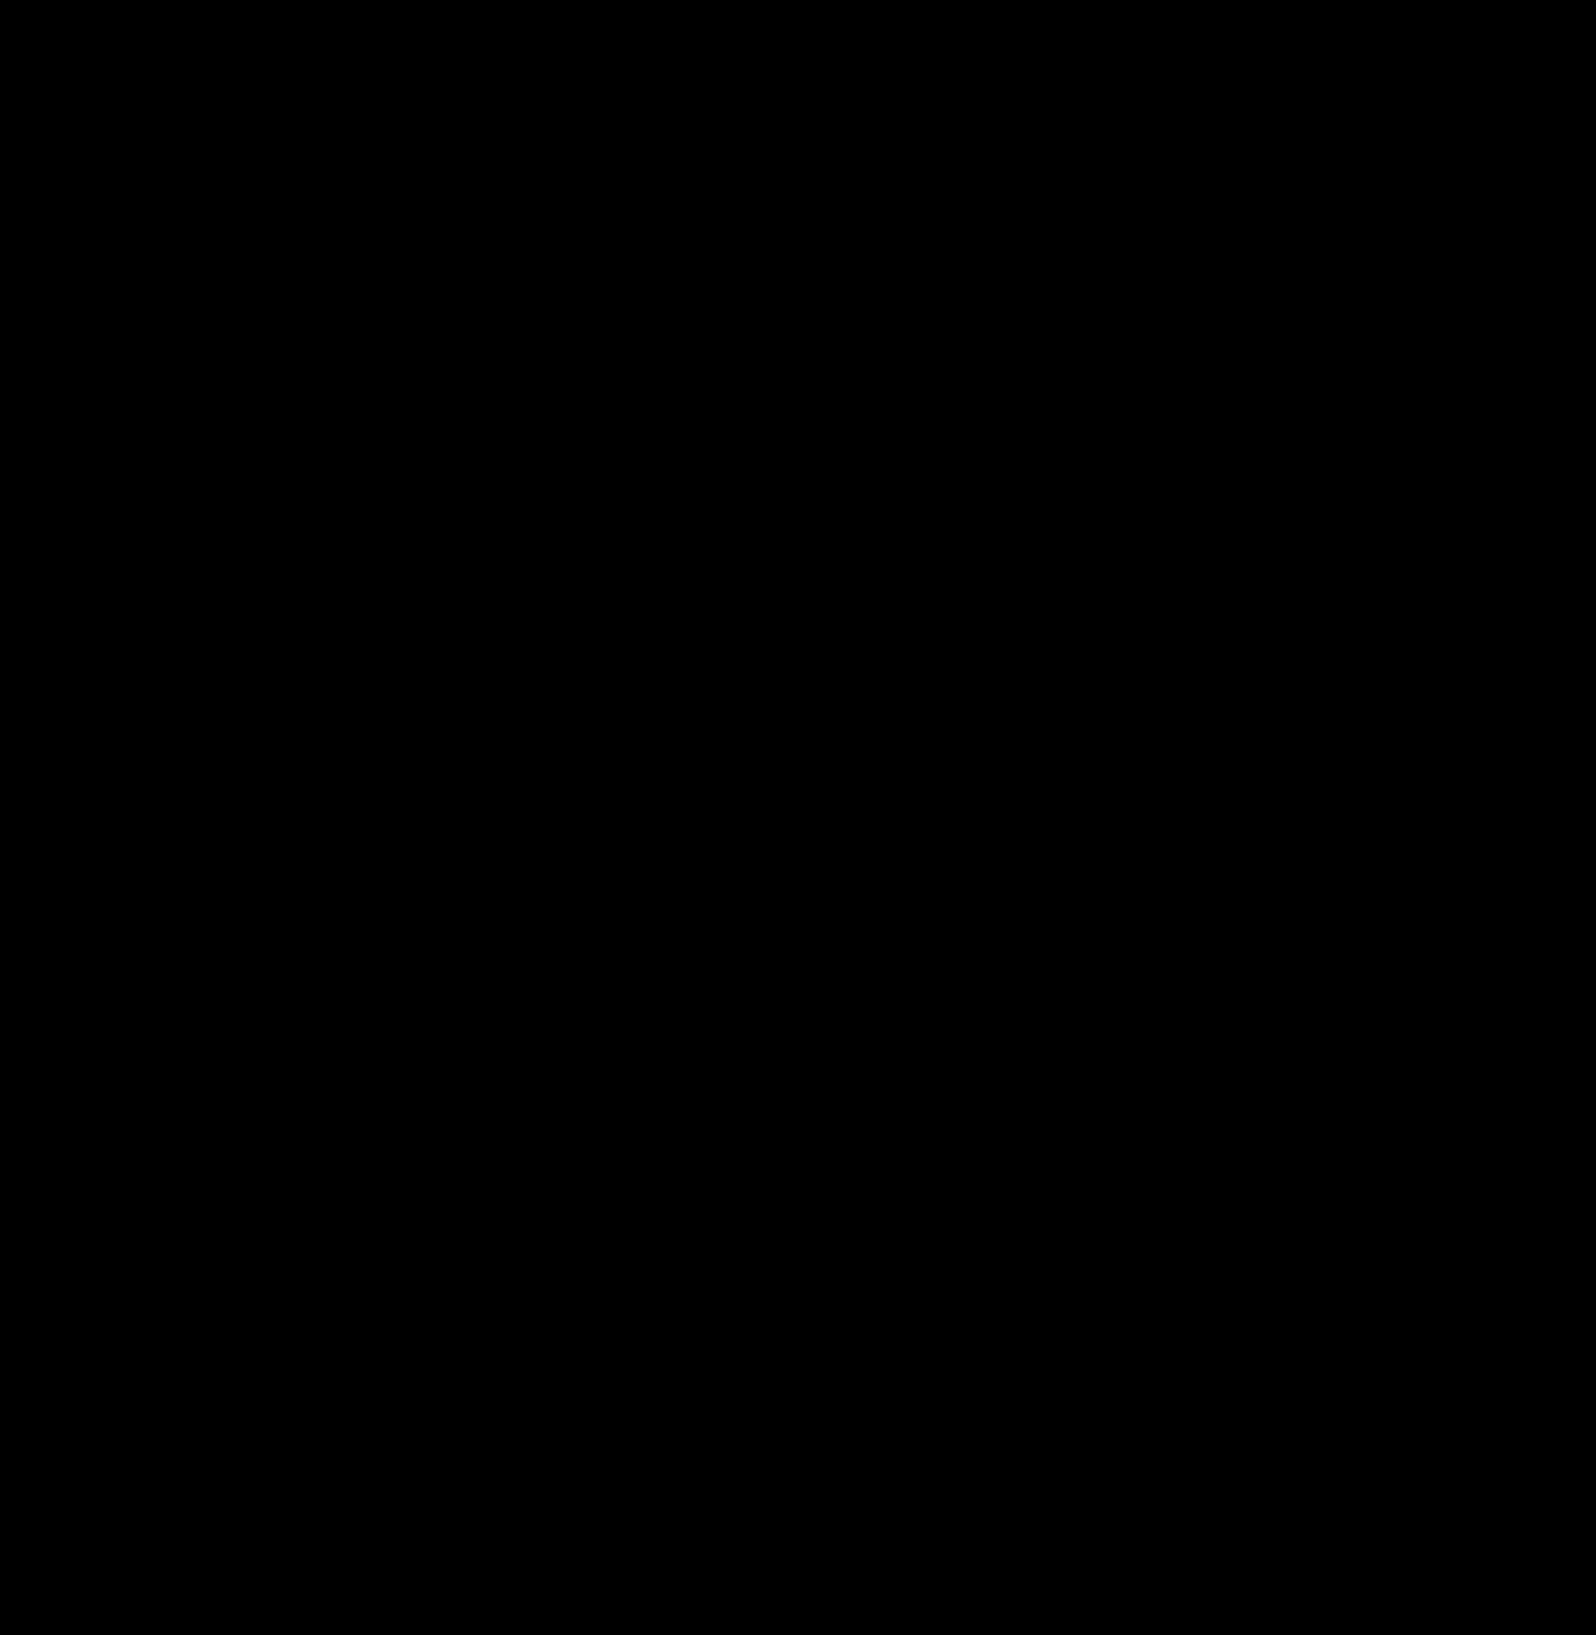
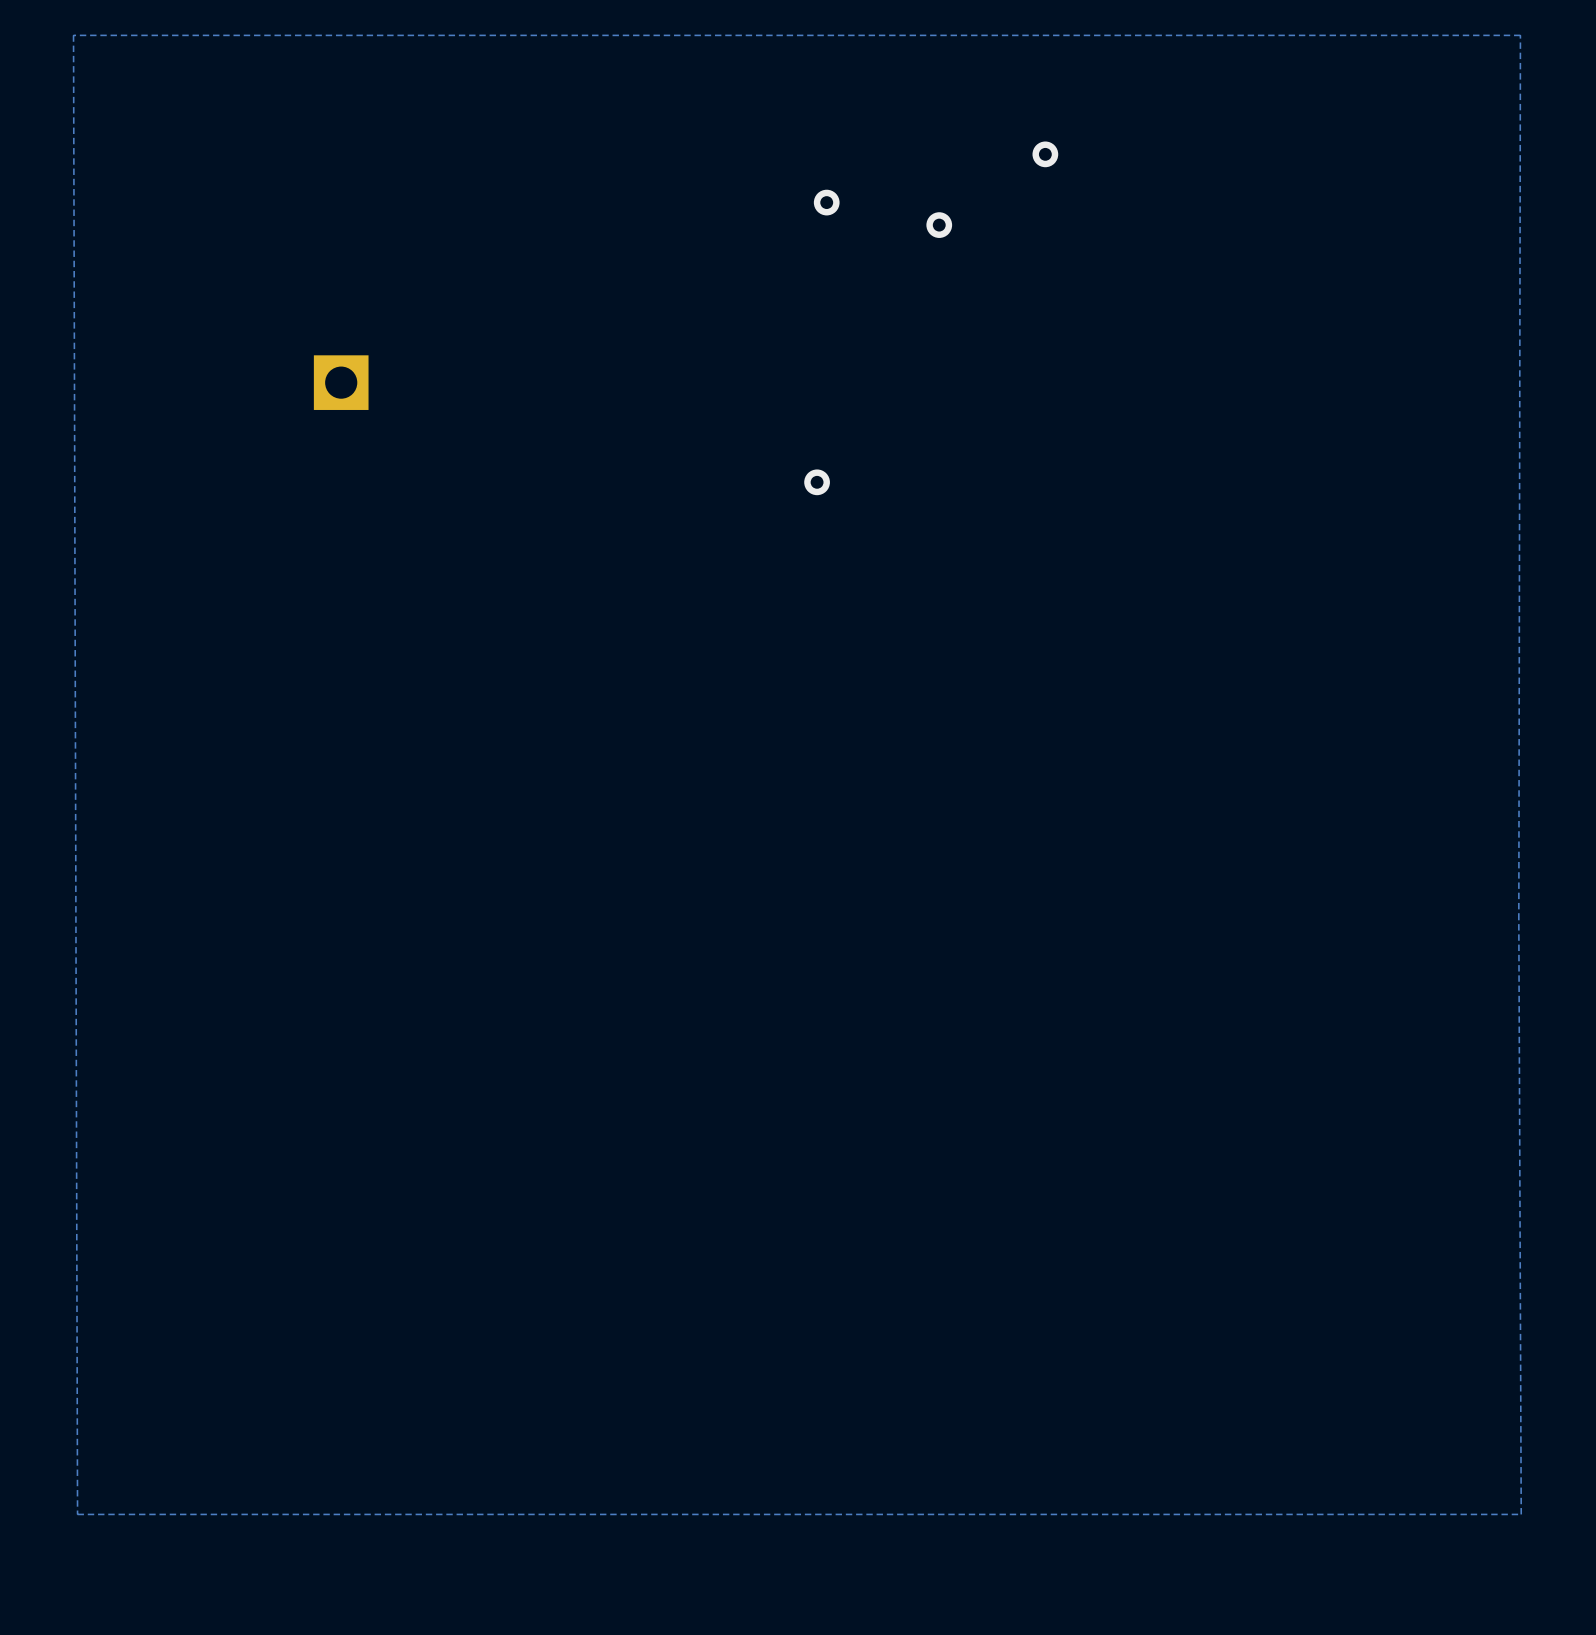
zone outline: none -> (1520, 35) (1518, 919) (1521, 1514) (77, 1514) (73, 35) (1520, 35)
via: none -> (1045, 154)
via: none -> (826, 202)
via: none -> (939, 225)
part: none -> (341, 382)
via: none -> (817, 482)

